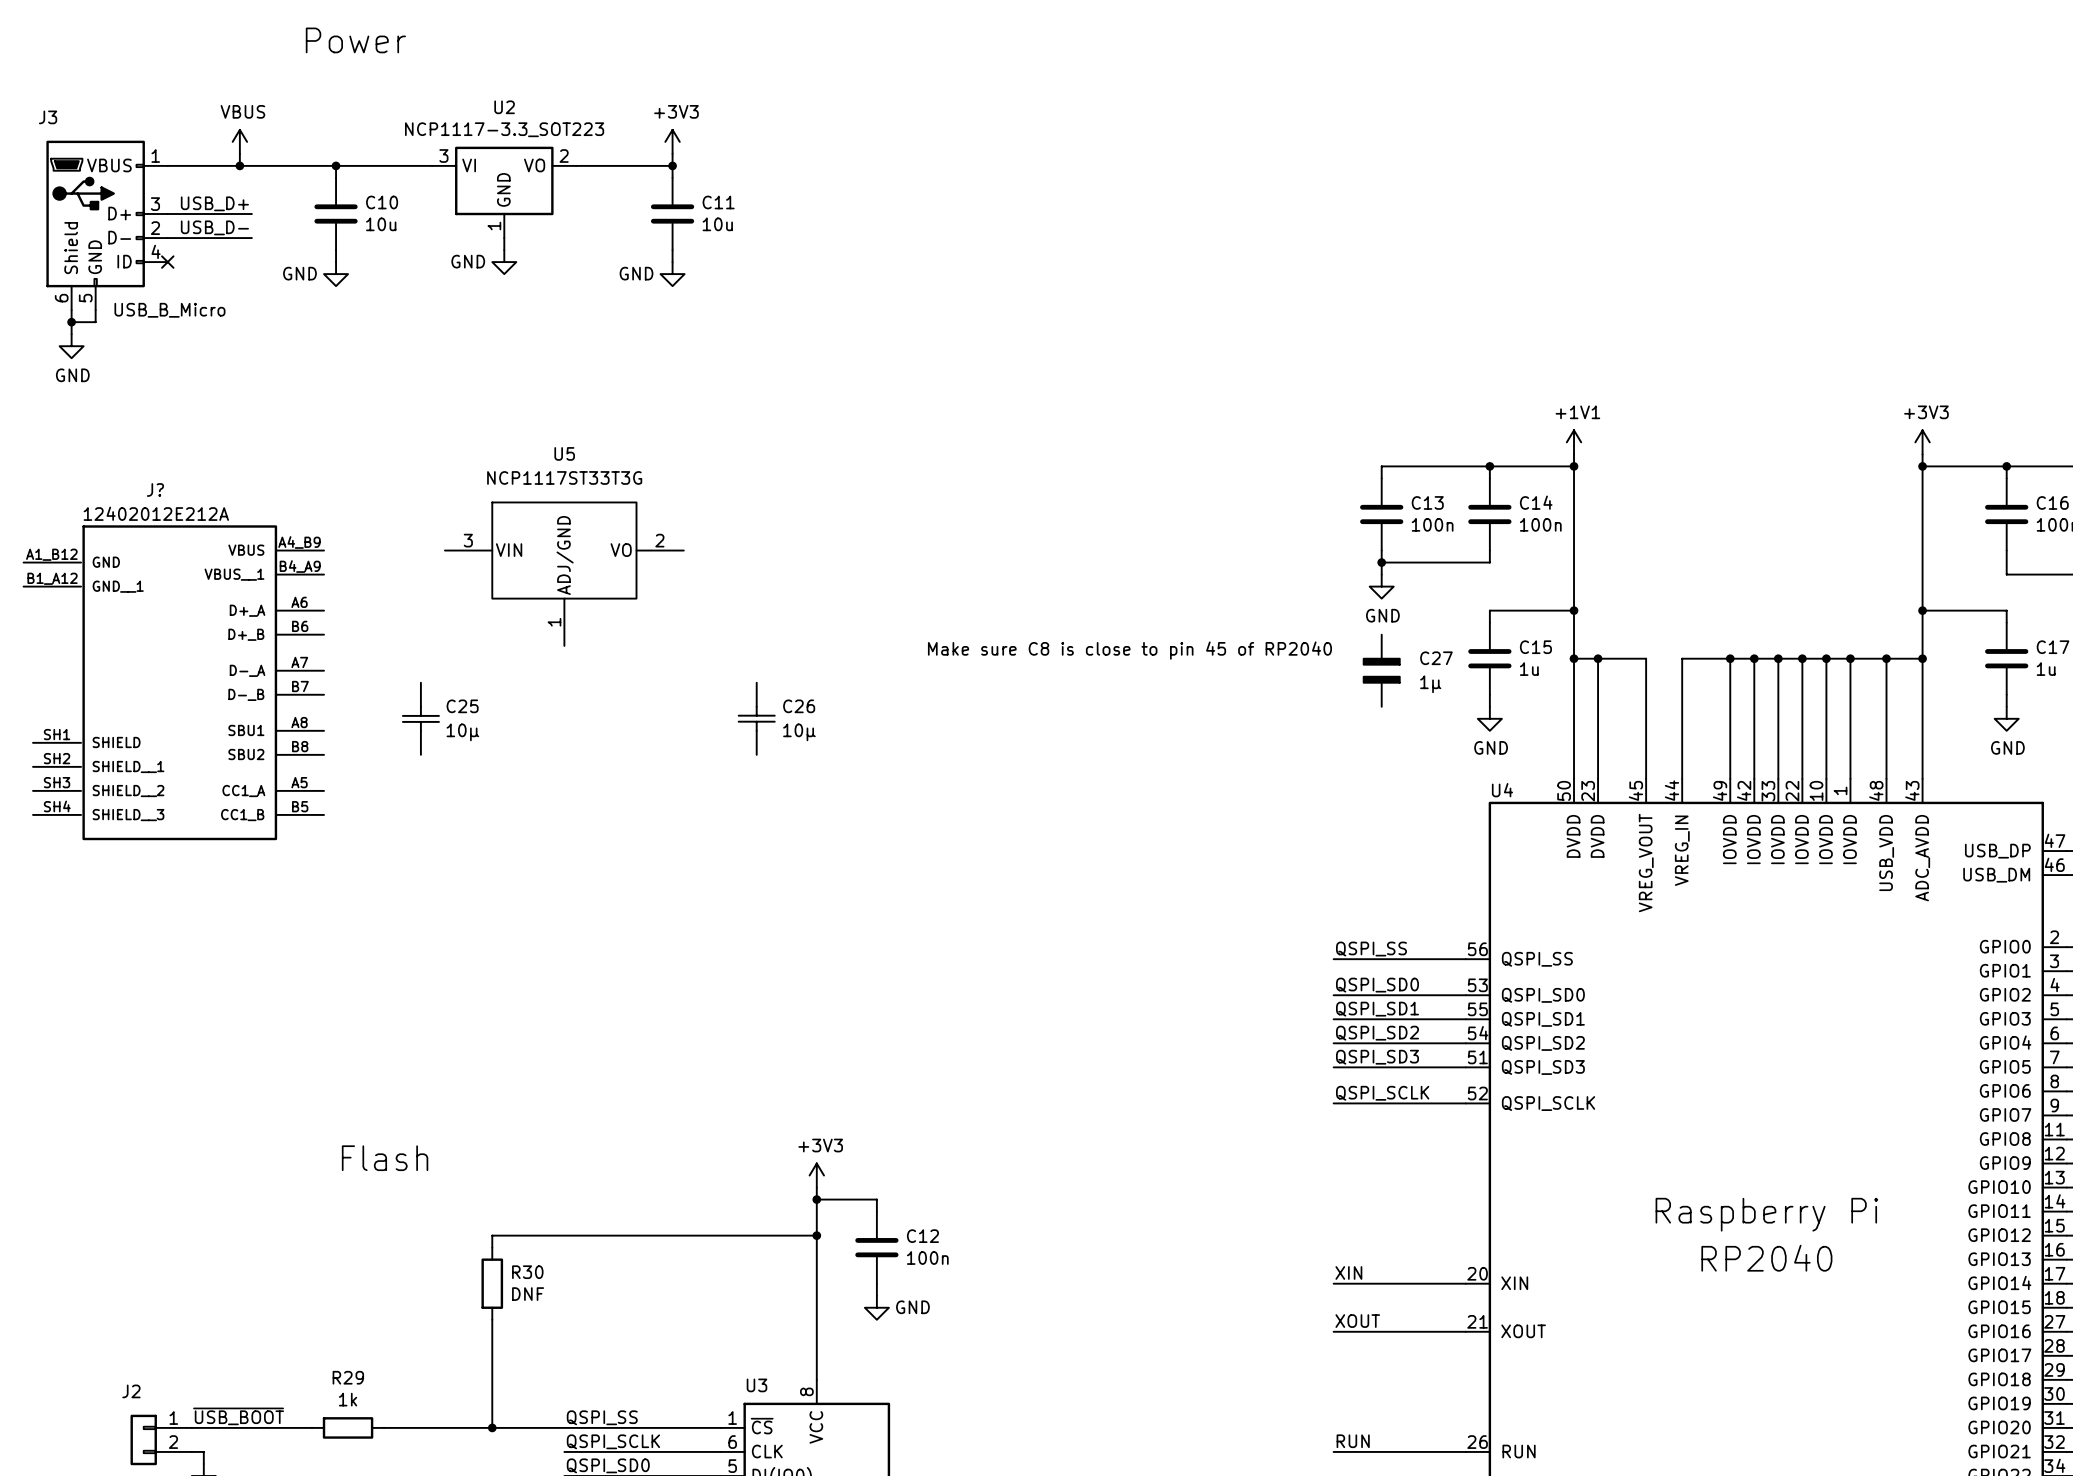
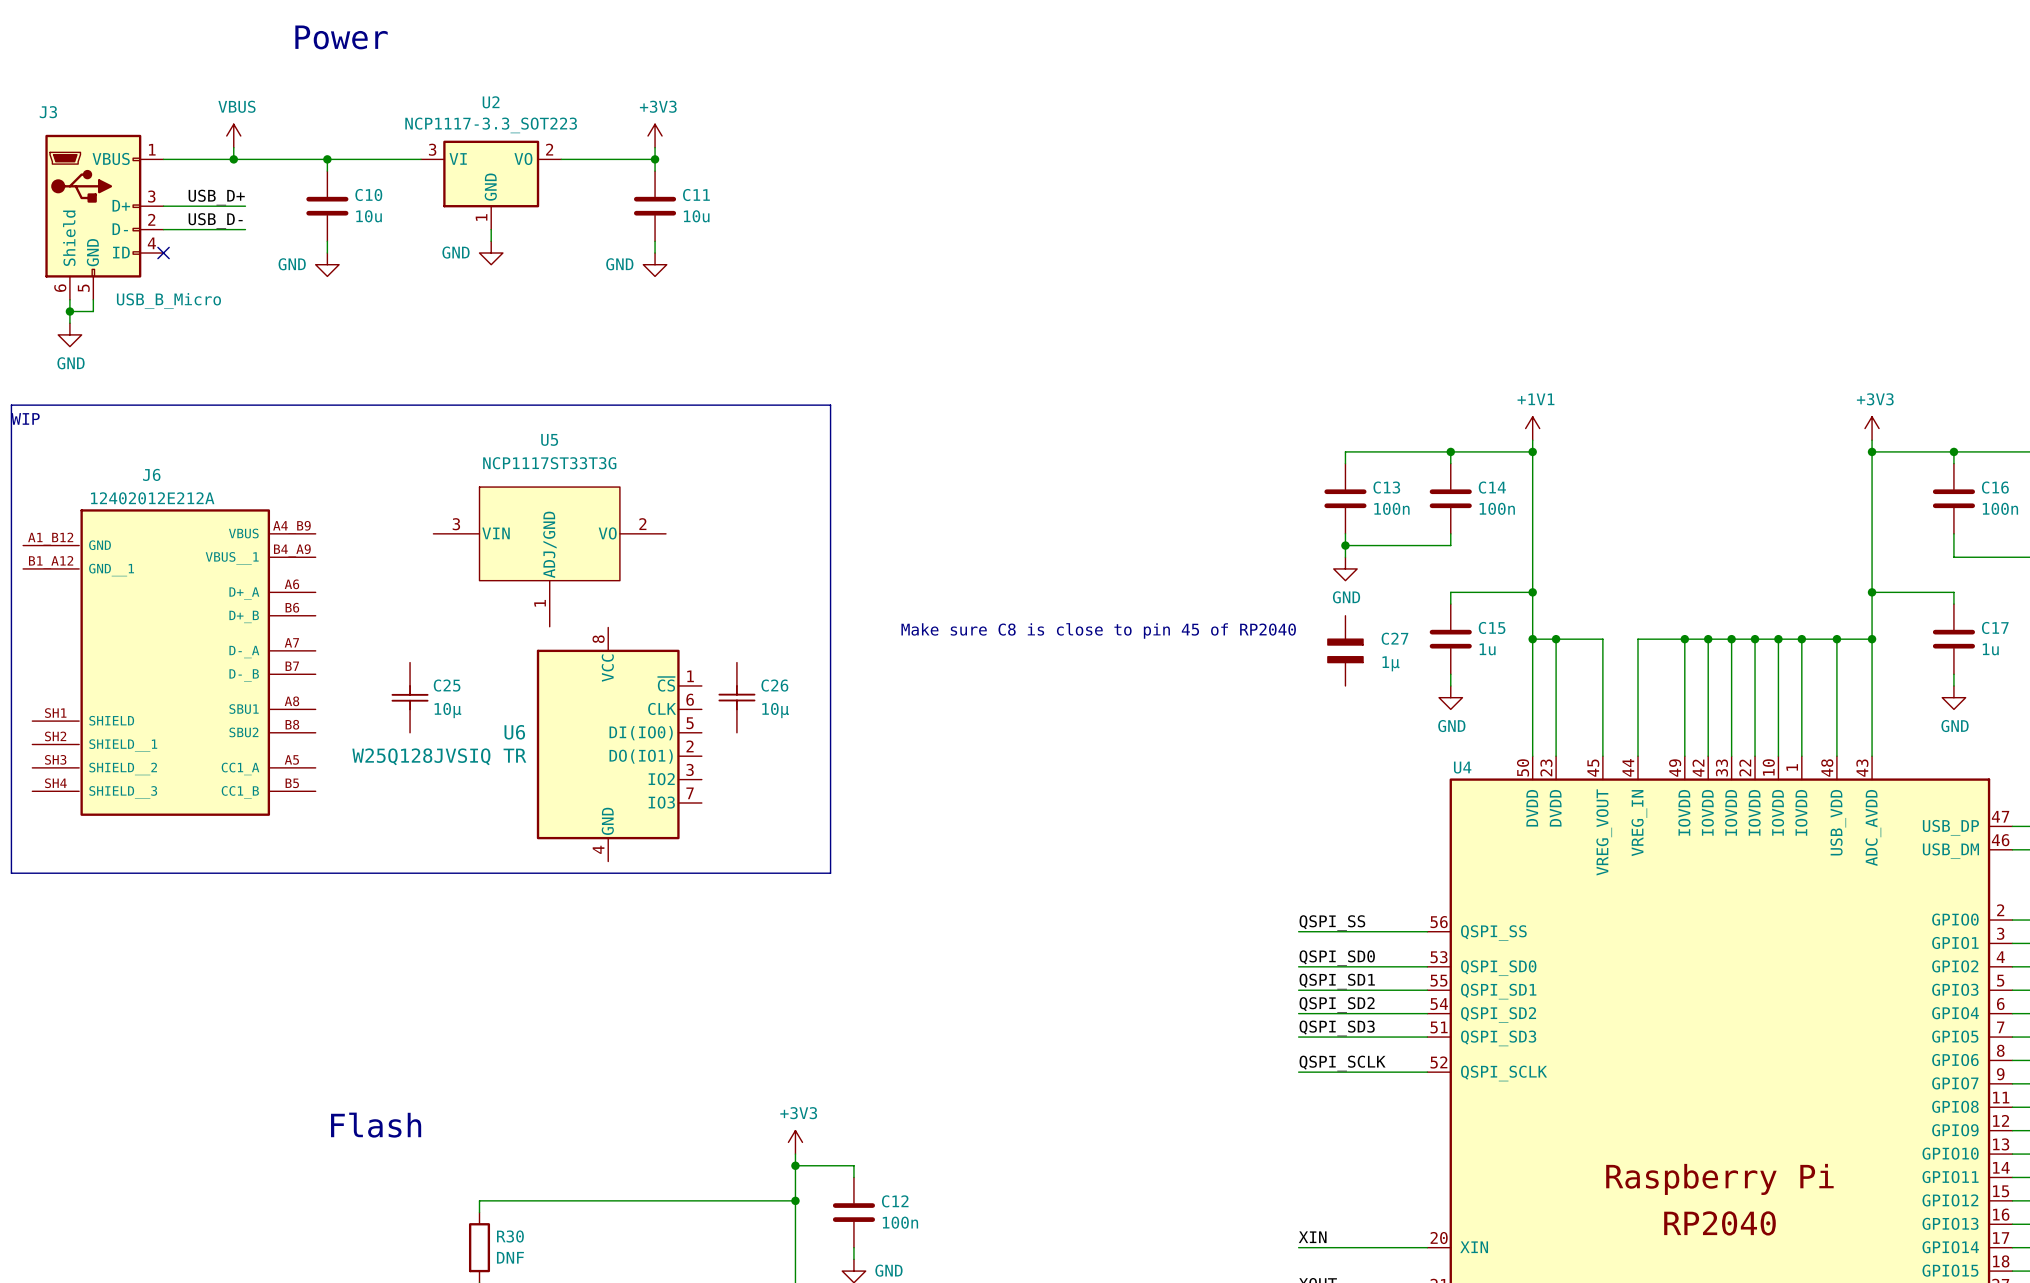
line: none -> (11, 405) (830, 405) (830, 873) (11, 873) (11, 405)
text: none -> WIP (25, 418)
J? name: J? (155, 489) -> J6 (151, 474)
U6: none -> W25Q128JVSIQ TR (619, 744)

